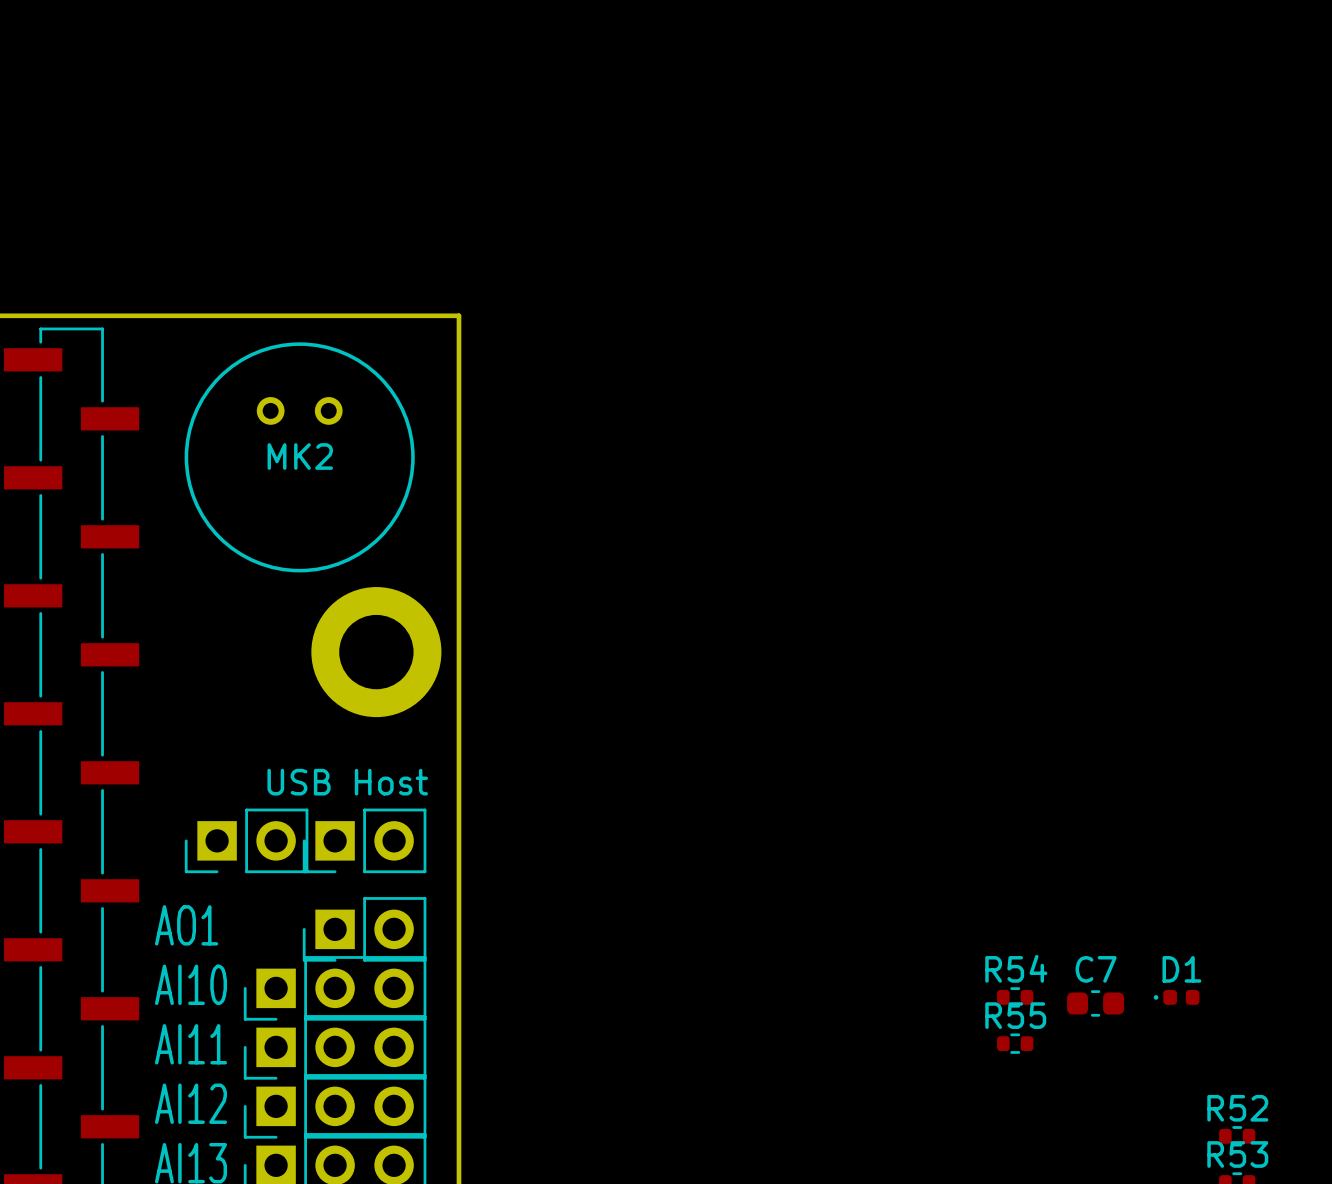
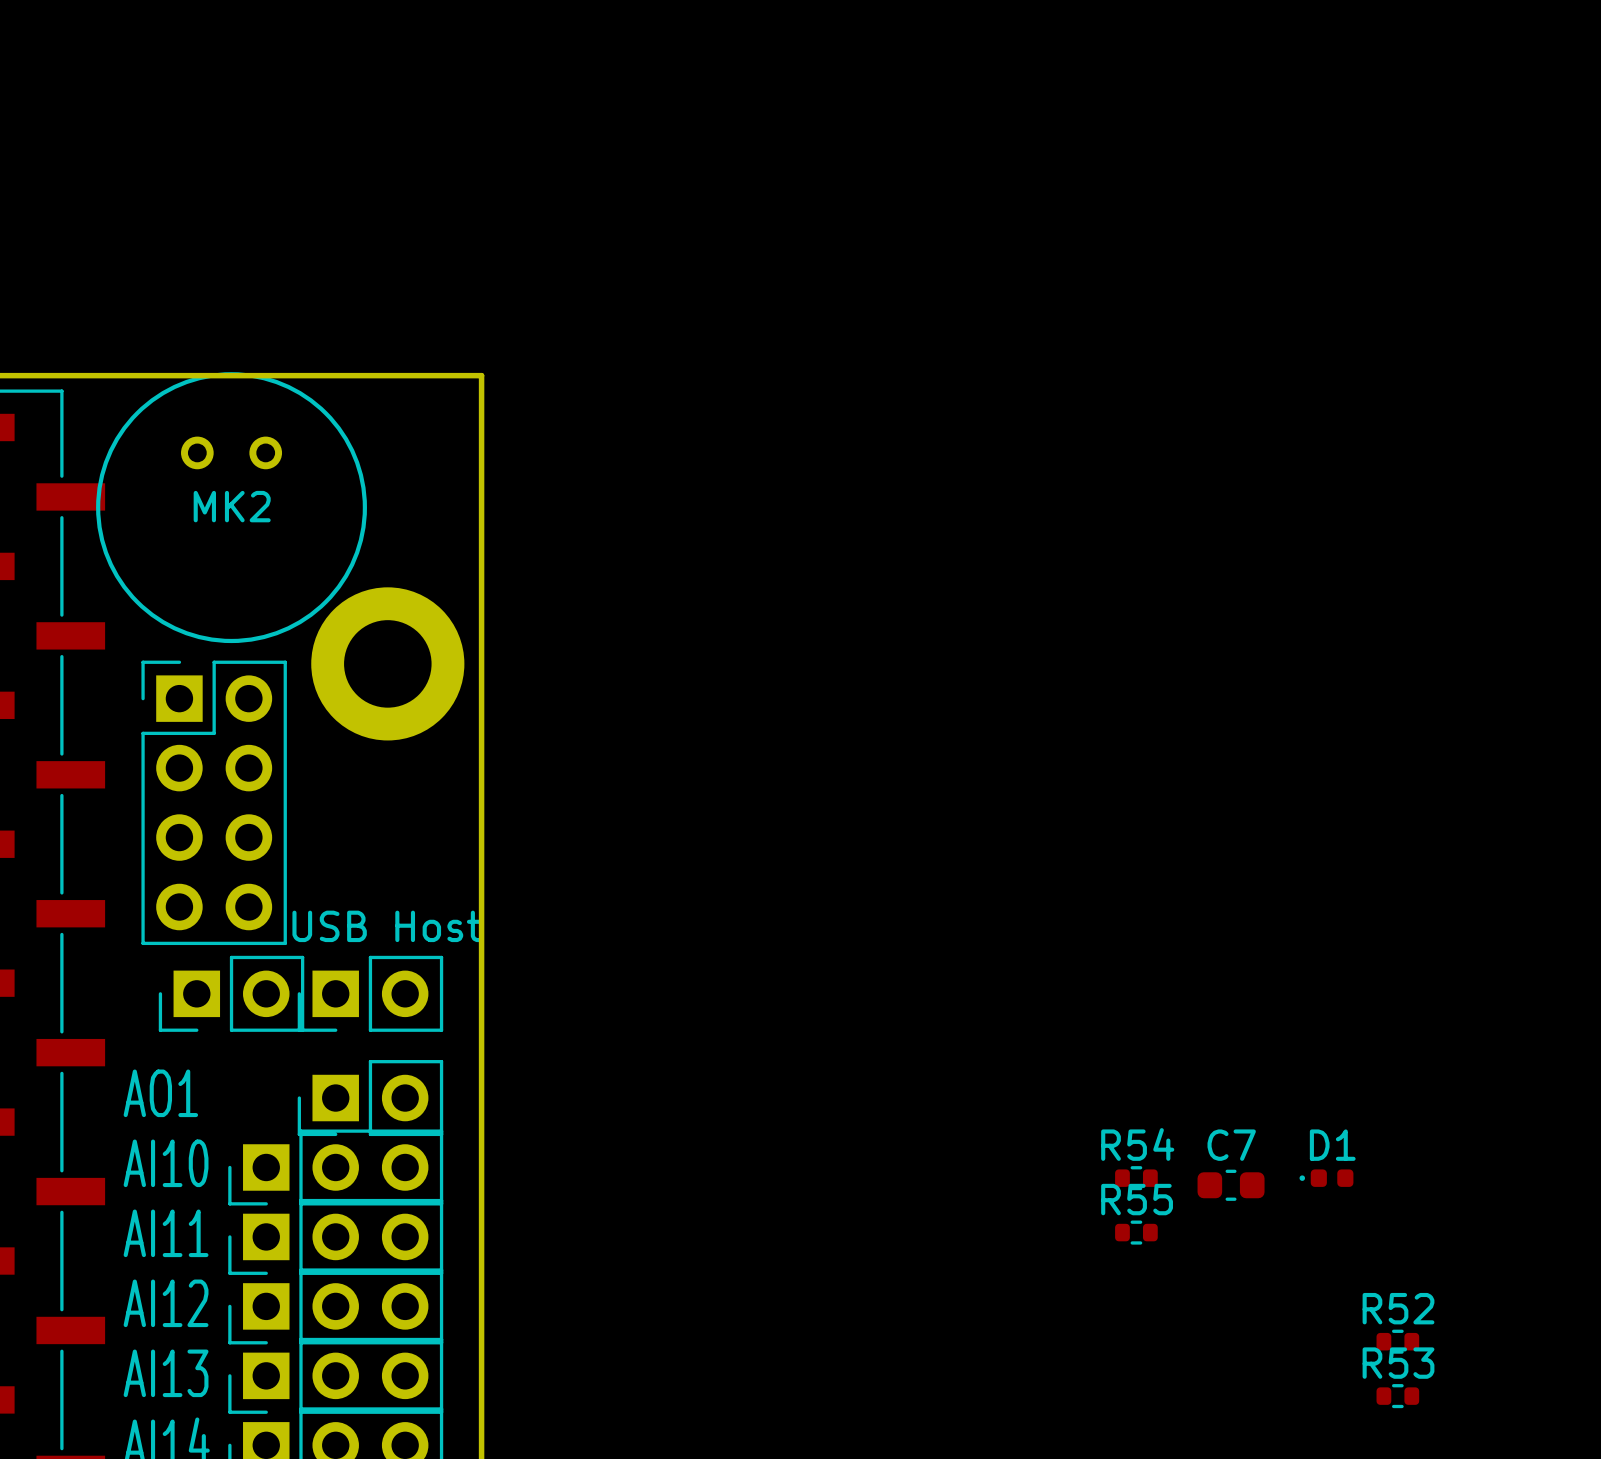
MK2 position: (299, 457) -> (231, 507)
part position: (376, 652) -> (387, 663)
part: none -> (214, 802)
text position: USB Host (347, 782) -> USB Host (386, 926)

